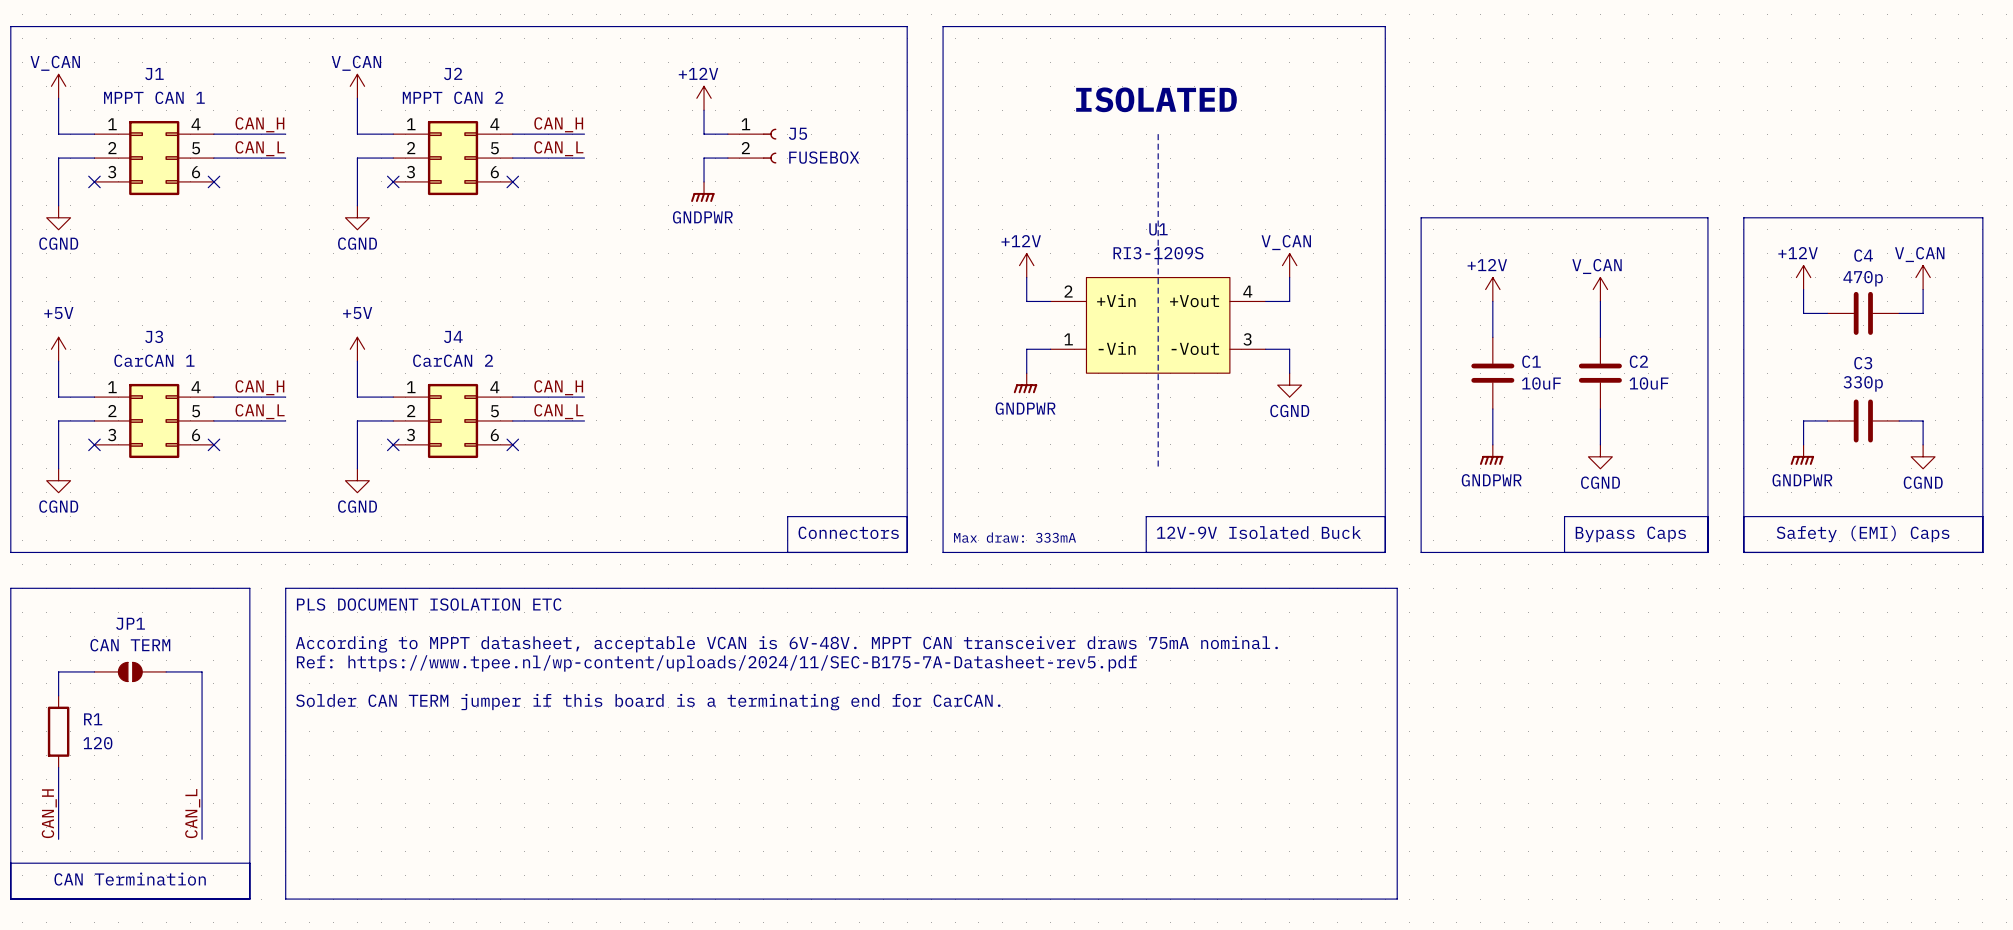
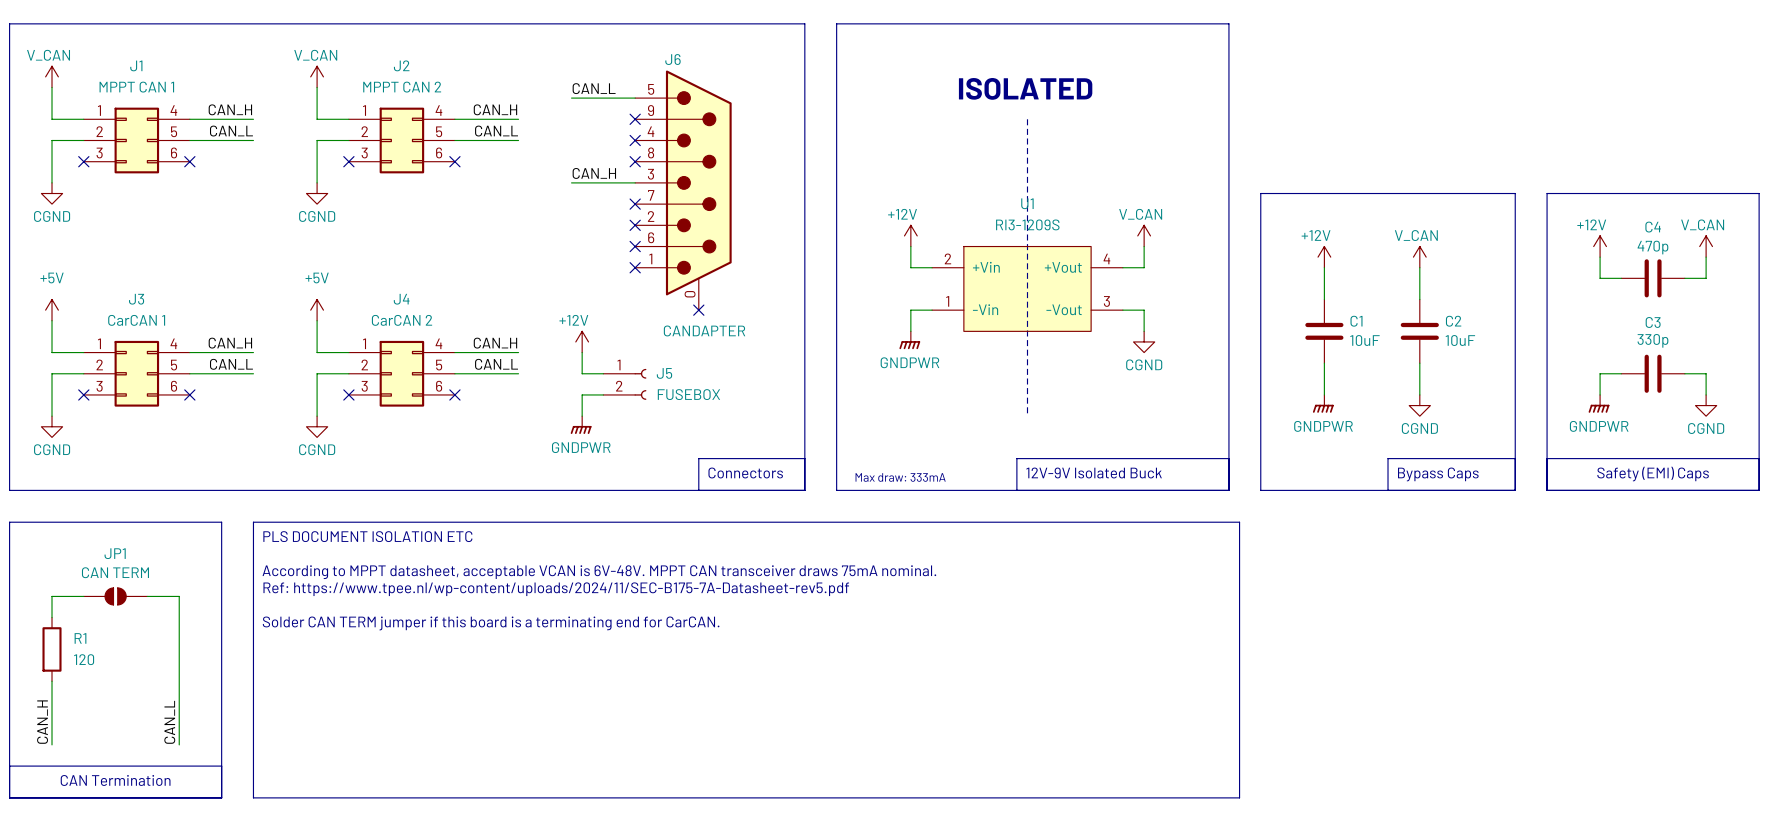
power symbol: +12V (704, 98) -> none
label: none -> CAN_L (594, 88)
wire: none -> (571, 98) (635, 98)
wire: (704, 110) (704, 134) (727, 134) -> none
no-connect mark: none -> (635, 119)
J5 position: (752, 146) -> (624, 384)
no-connect mark: none -> (635, 140)
wire: (727, 158) (704, 158) (704, 181) -> none
no-connect mark: none -> (635, 161)
power symbol: GNDPWR (702, 191) -> none
label: none -> CAN_H (594, 173)
wire: none -> (571, 182) (635, 182)
J6: none -> CANDAPTER (683, 190)
no-connect mark: none -> (635, 204)
no-connect mark: none -> (635, 225)
no-connect mark: none -> (635, 246)
no-connect mark: none -> (635, 267)
no-connect mark: none -> (698, 310)
power symbol: none -> +12V (582, 341)
wire: none -> (582, 352) (582, 373) (603, 373)
wire: none -> (603, 394) (582, 394) (582, 416)
power symbol: none -> GNDPWR (581, 425)

